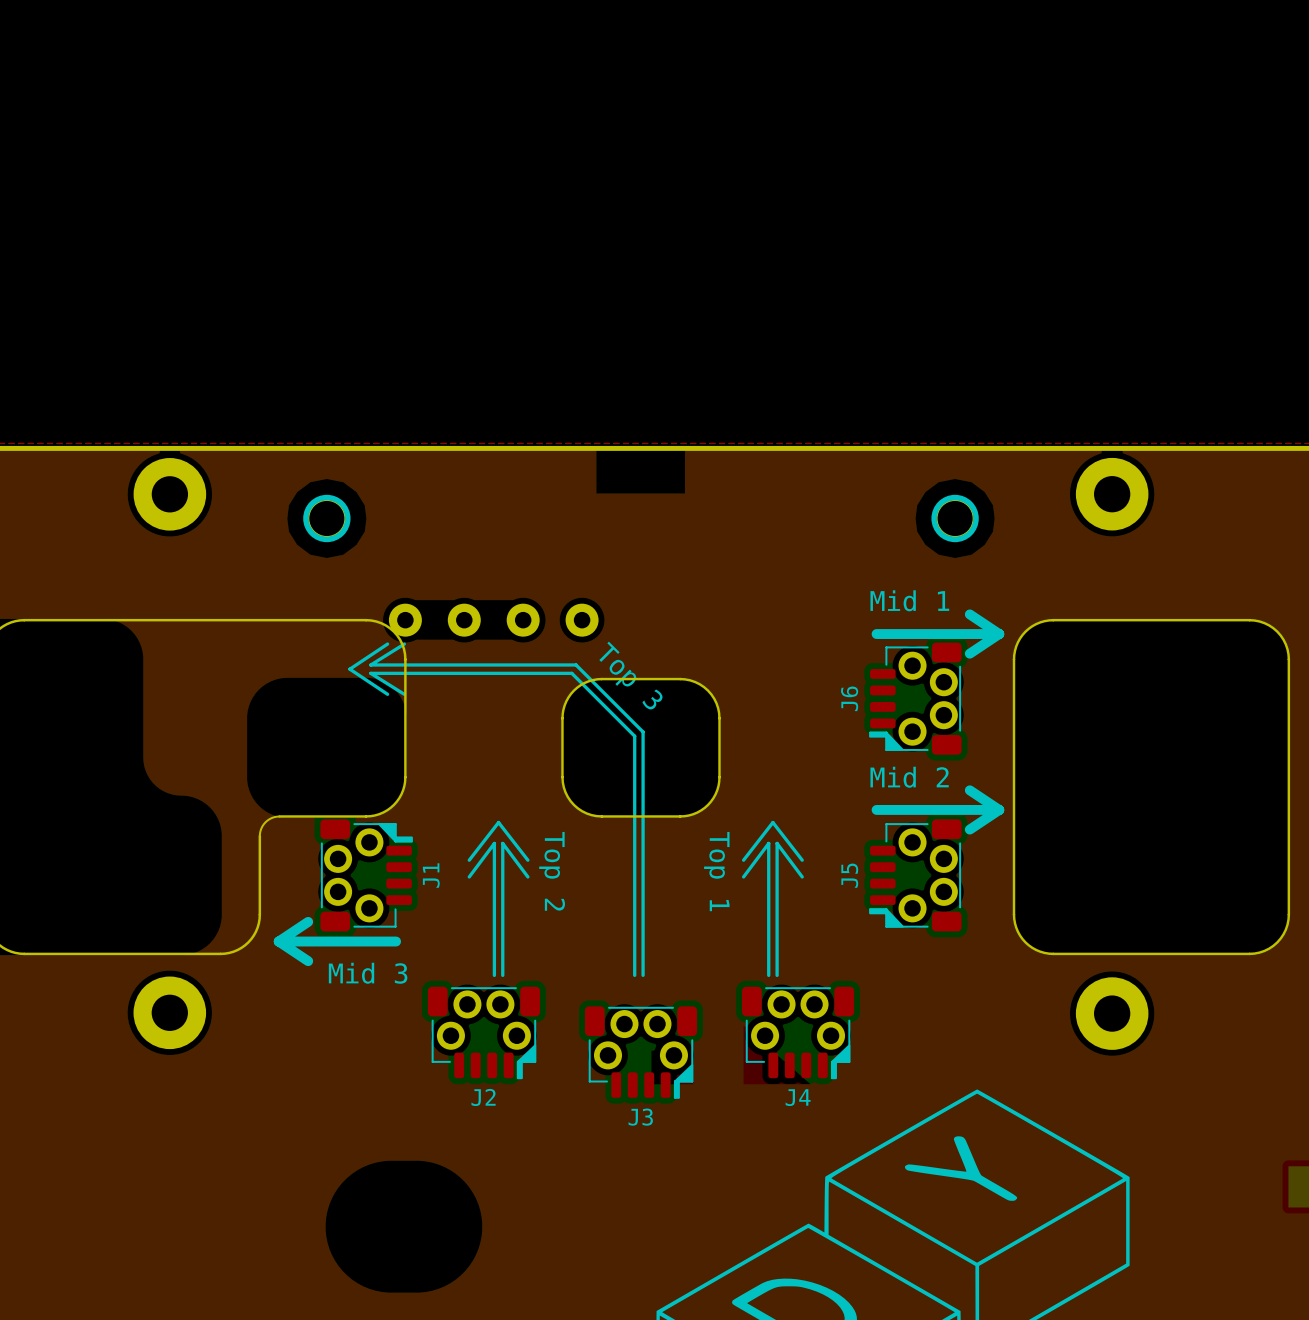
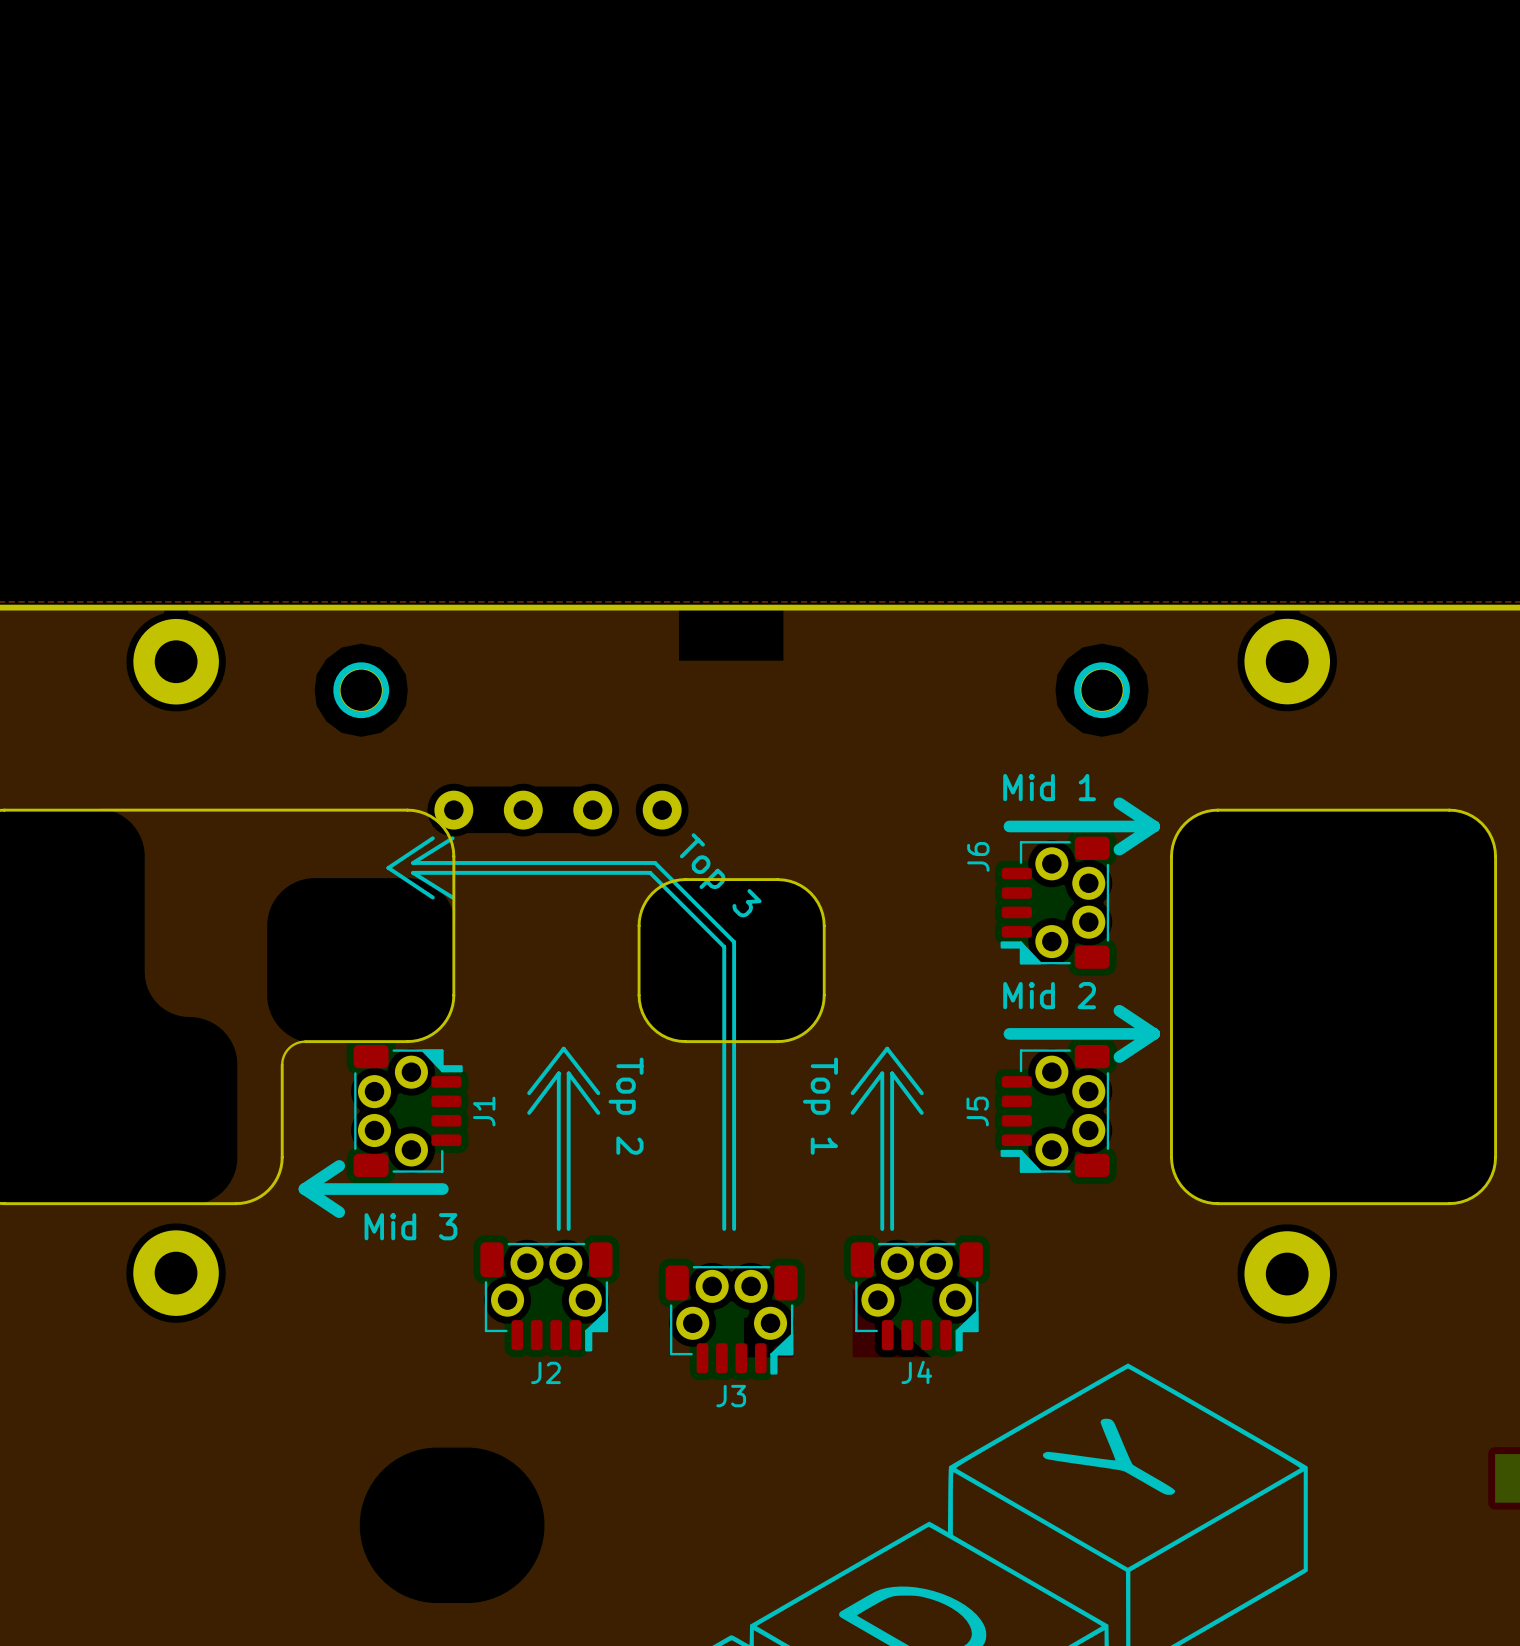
J6 name position: J6 (849, 698) -> J6 (978, 856)

